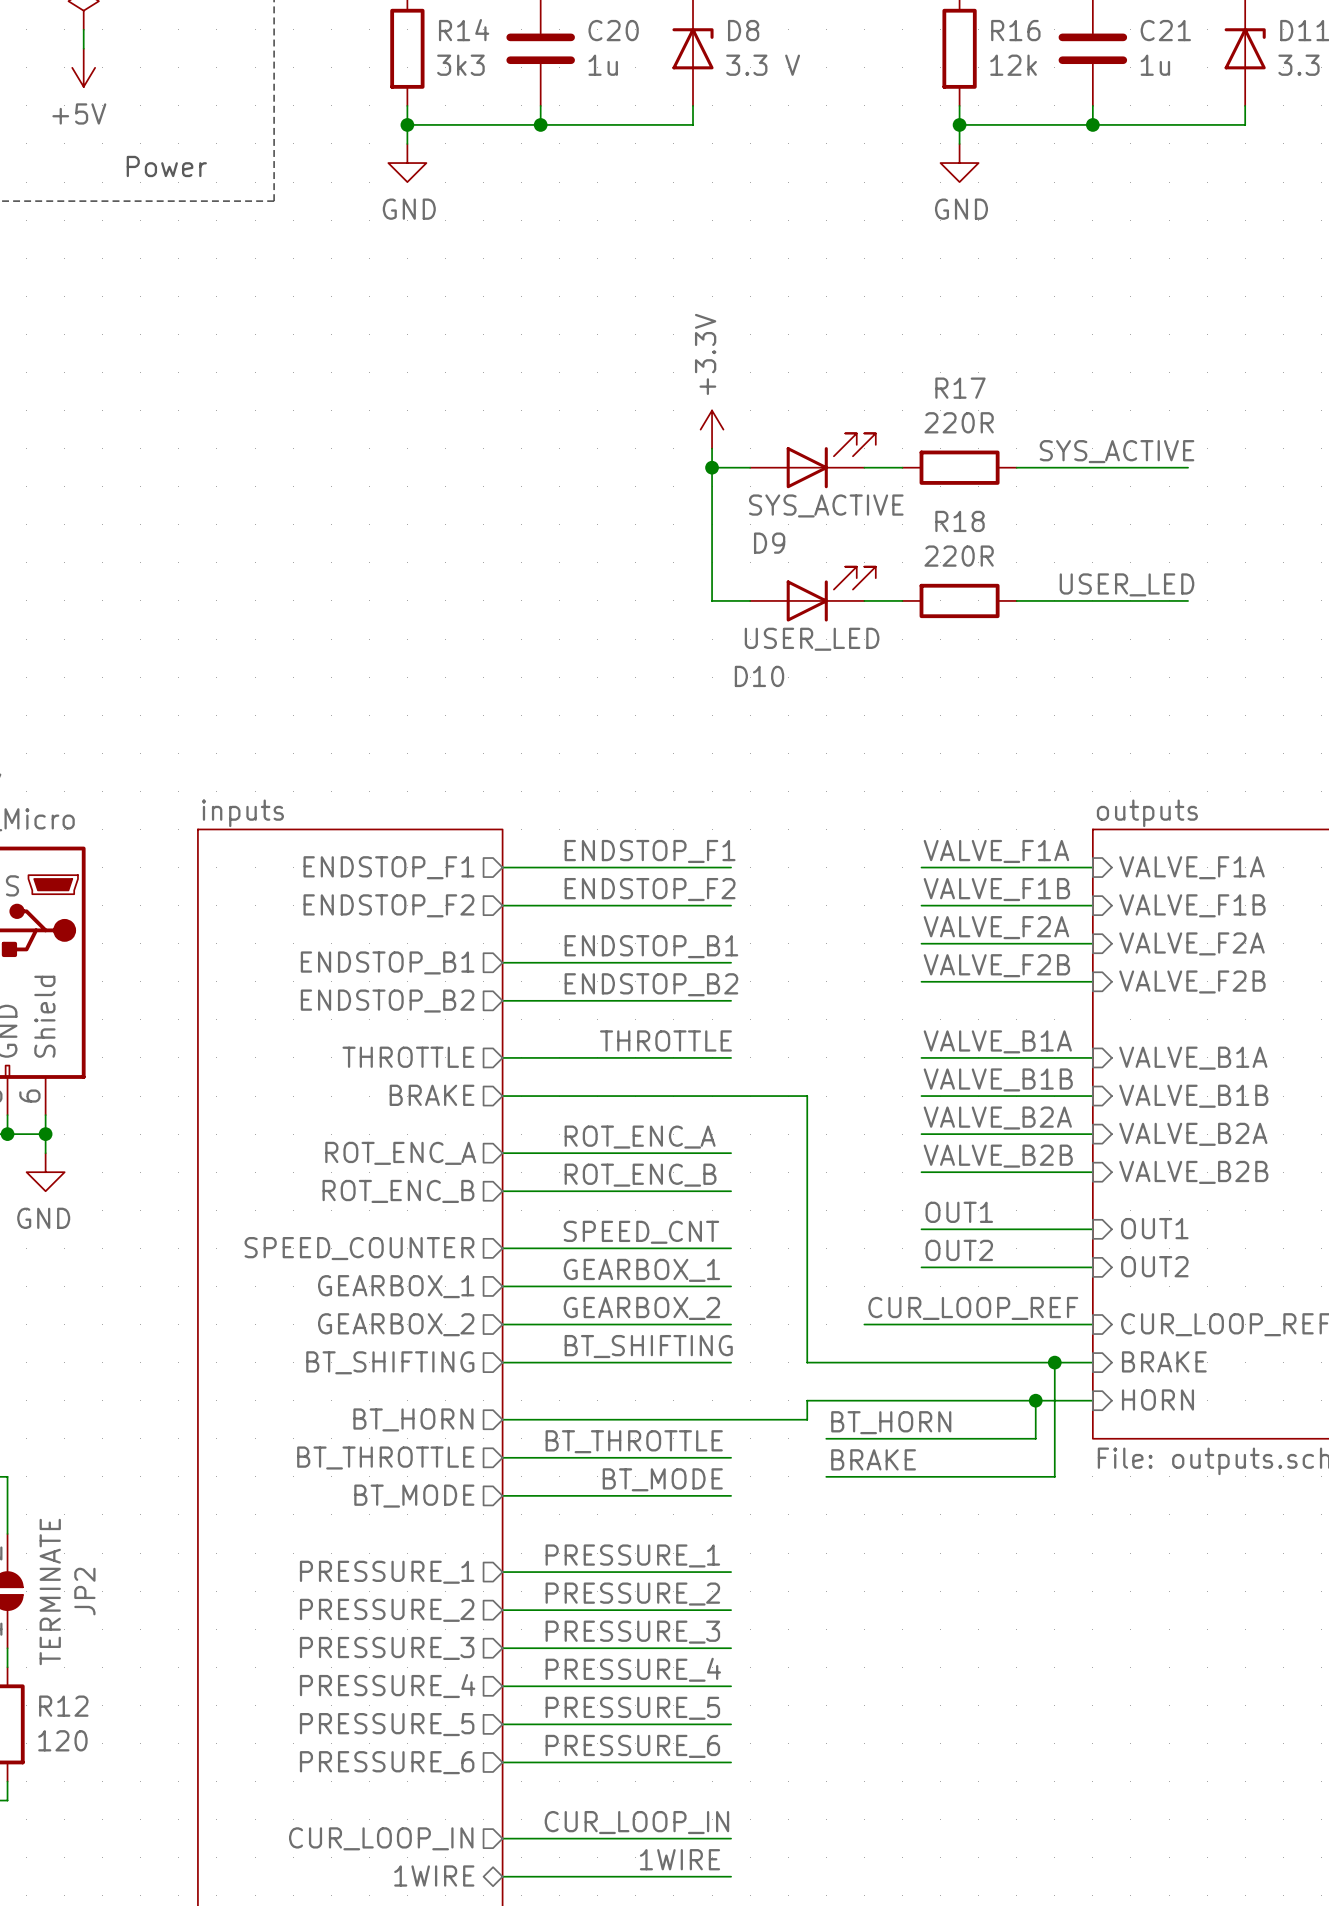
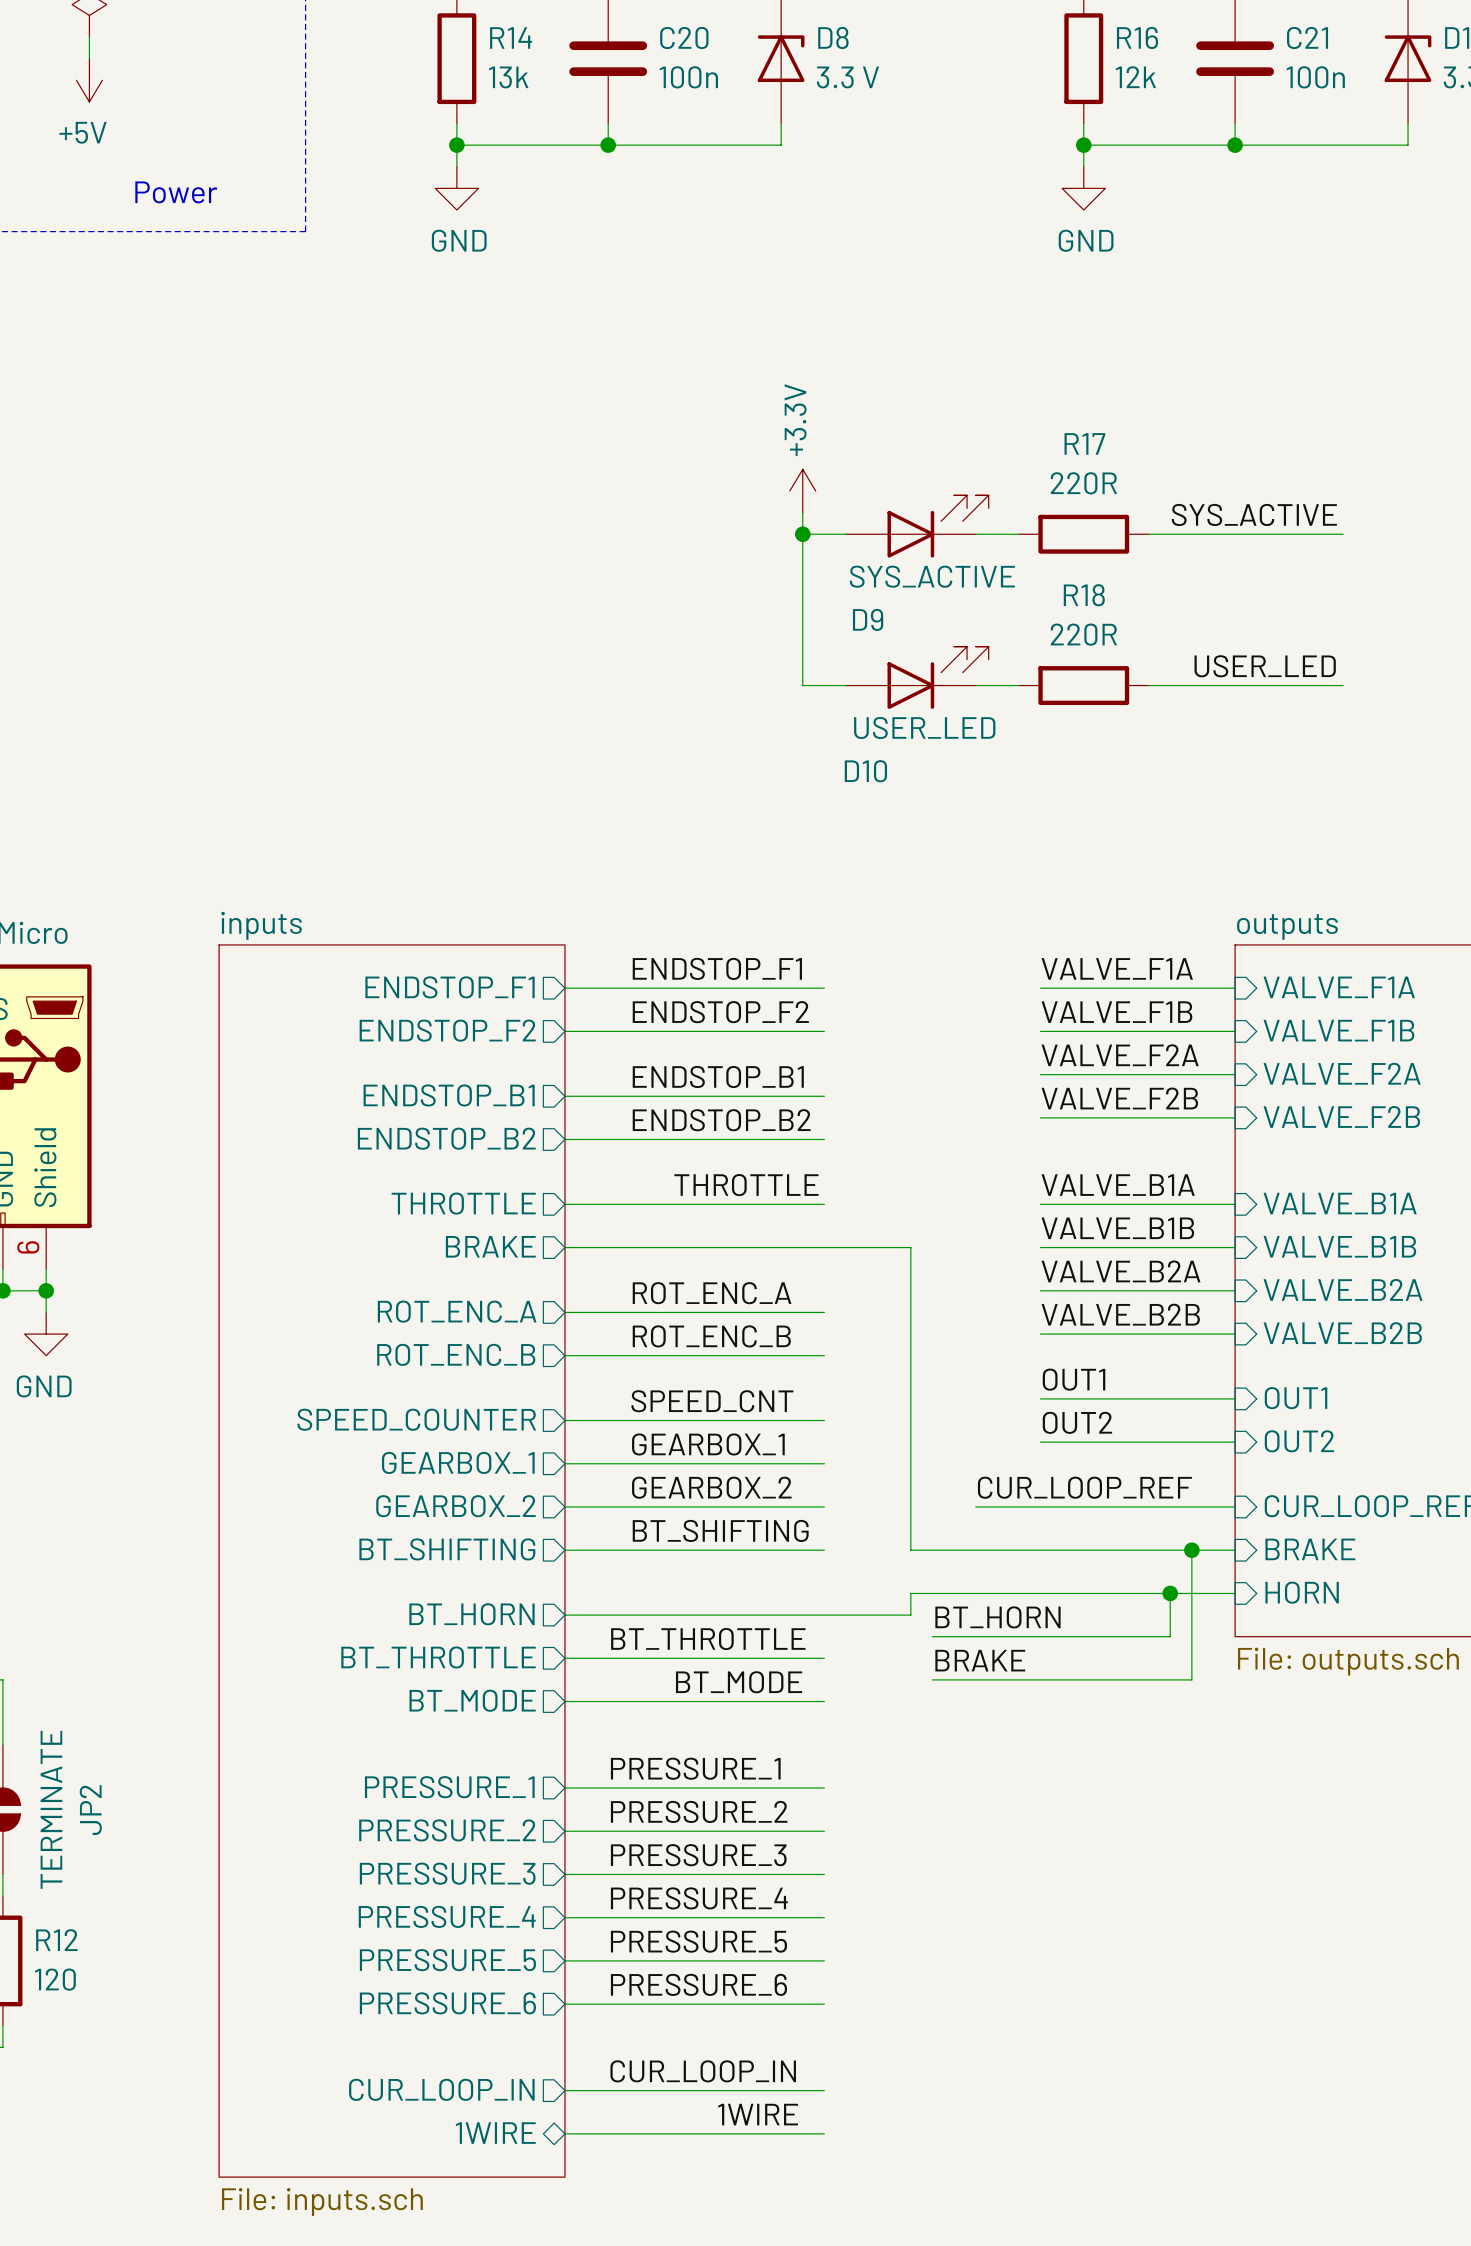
R14 value: 3k3 (460, 65) -> 13k (508, 77)
C20 value: 1u (603, 65) -> 100n (688, 77)
C21 value: 1u (1155, 65) -> 100n (1315, 77)

